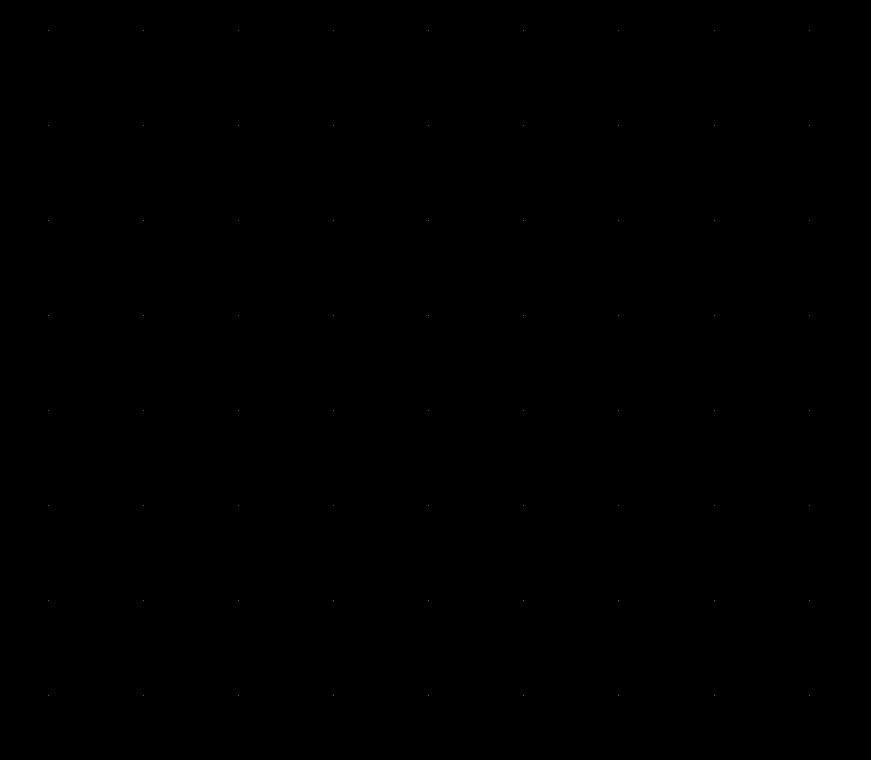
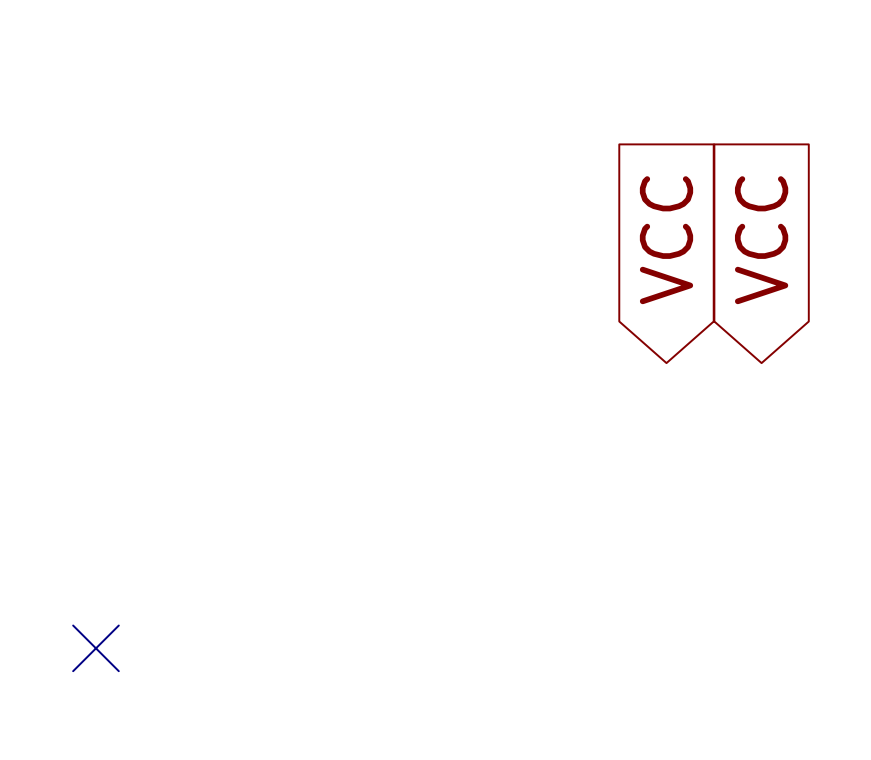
global label: none -> VCC (666, 240)
global label: none -> VCC (761, 240)
no-connect mark: none -> (95, 648)

